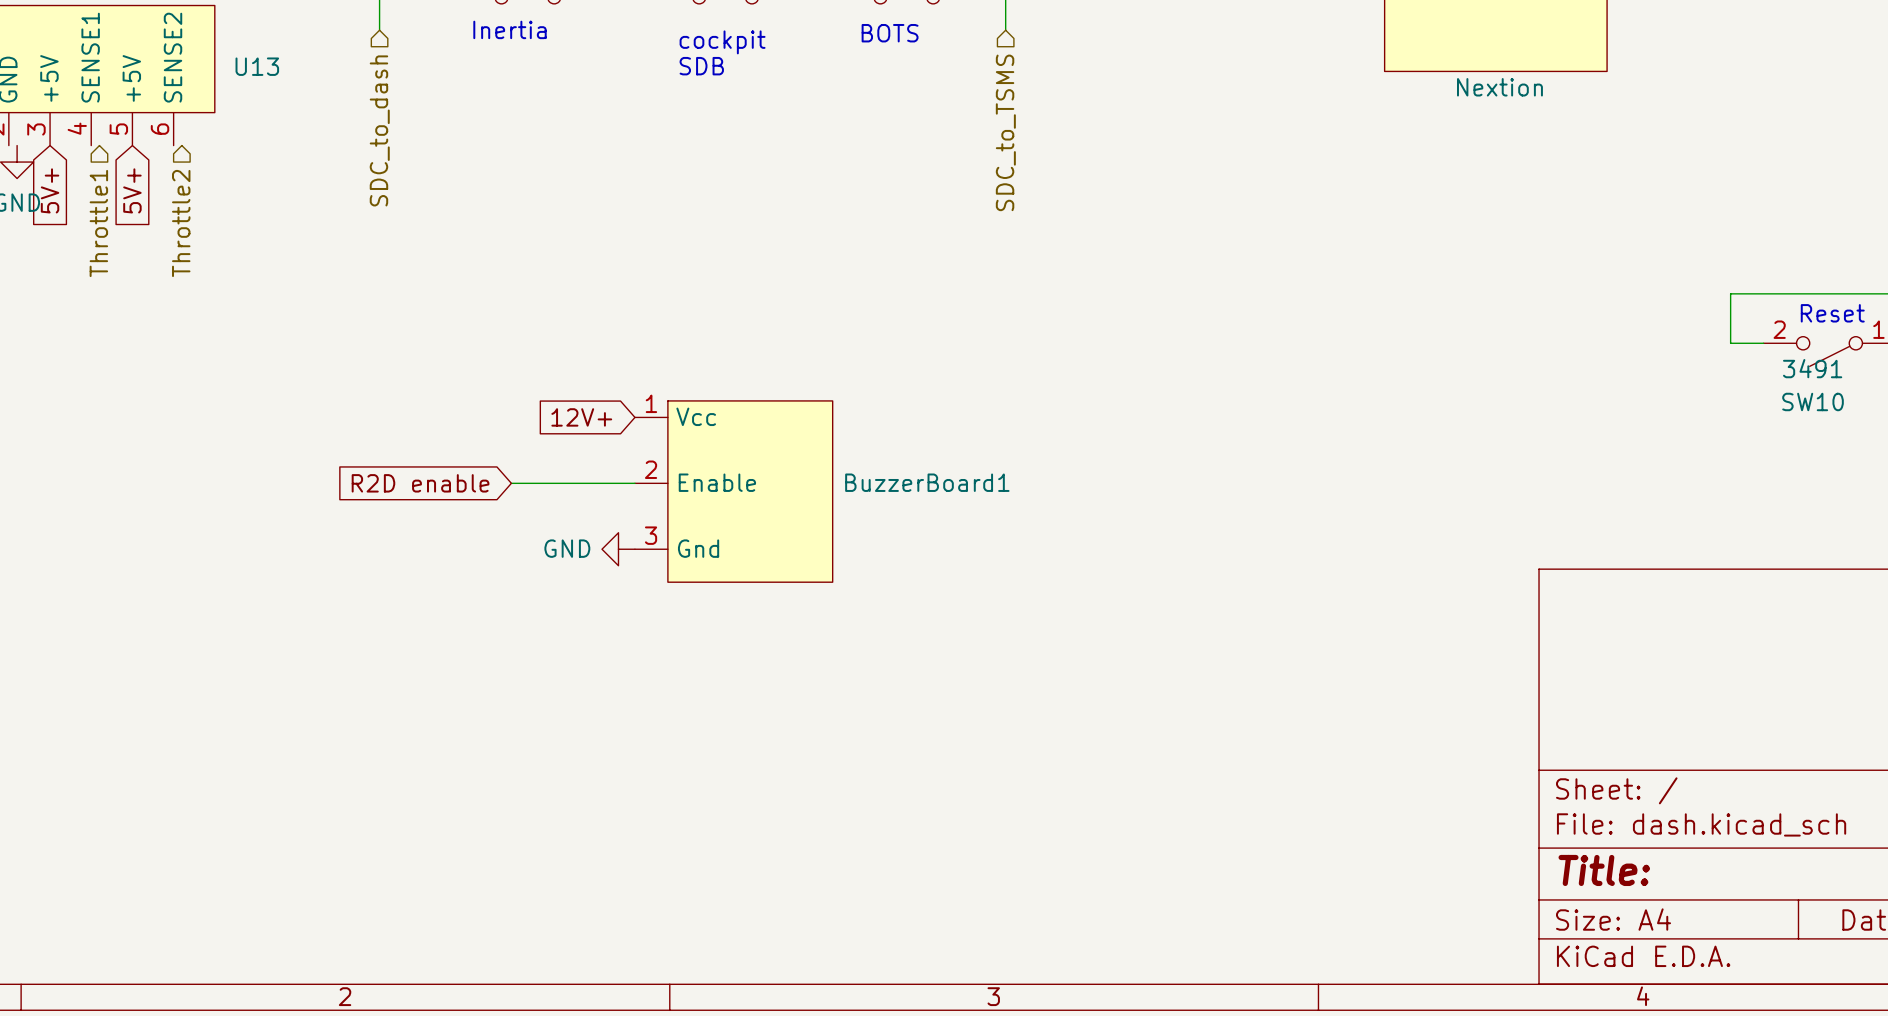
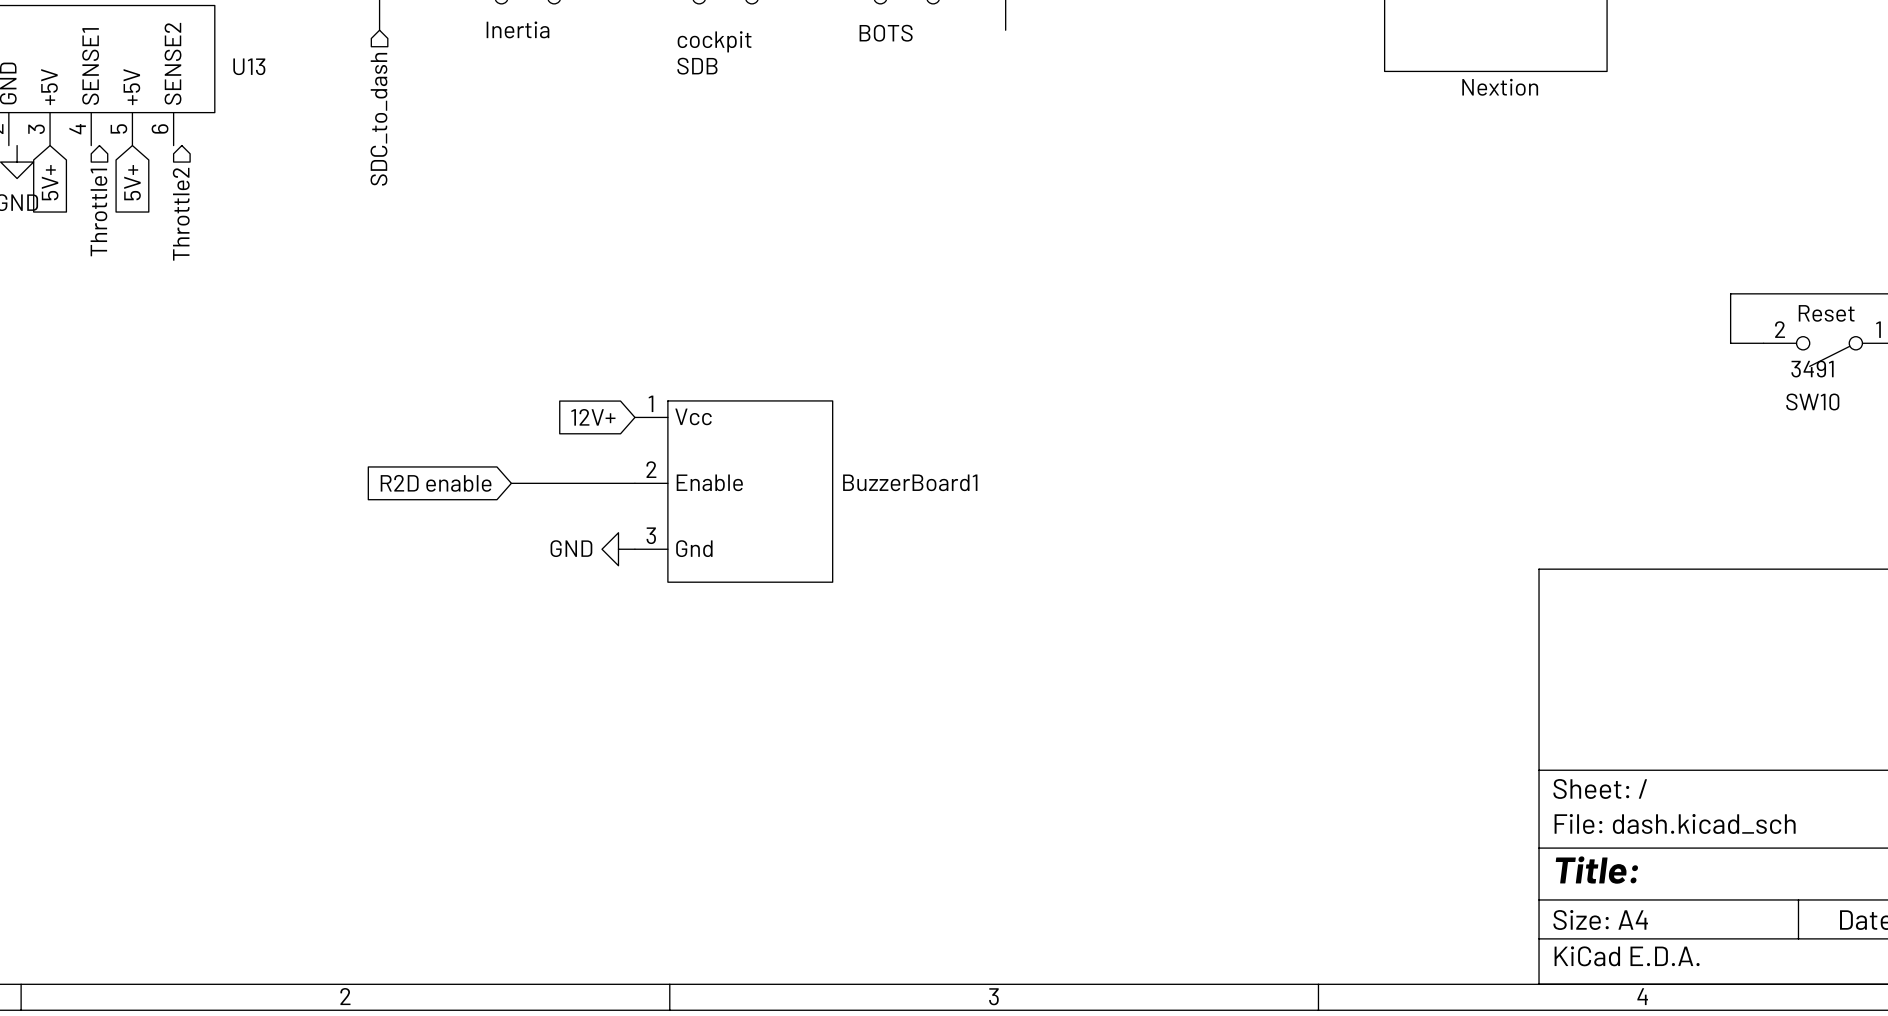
hierarchical label: SDC_to_TSMS (1005, 132) -> none

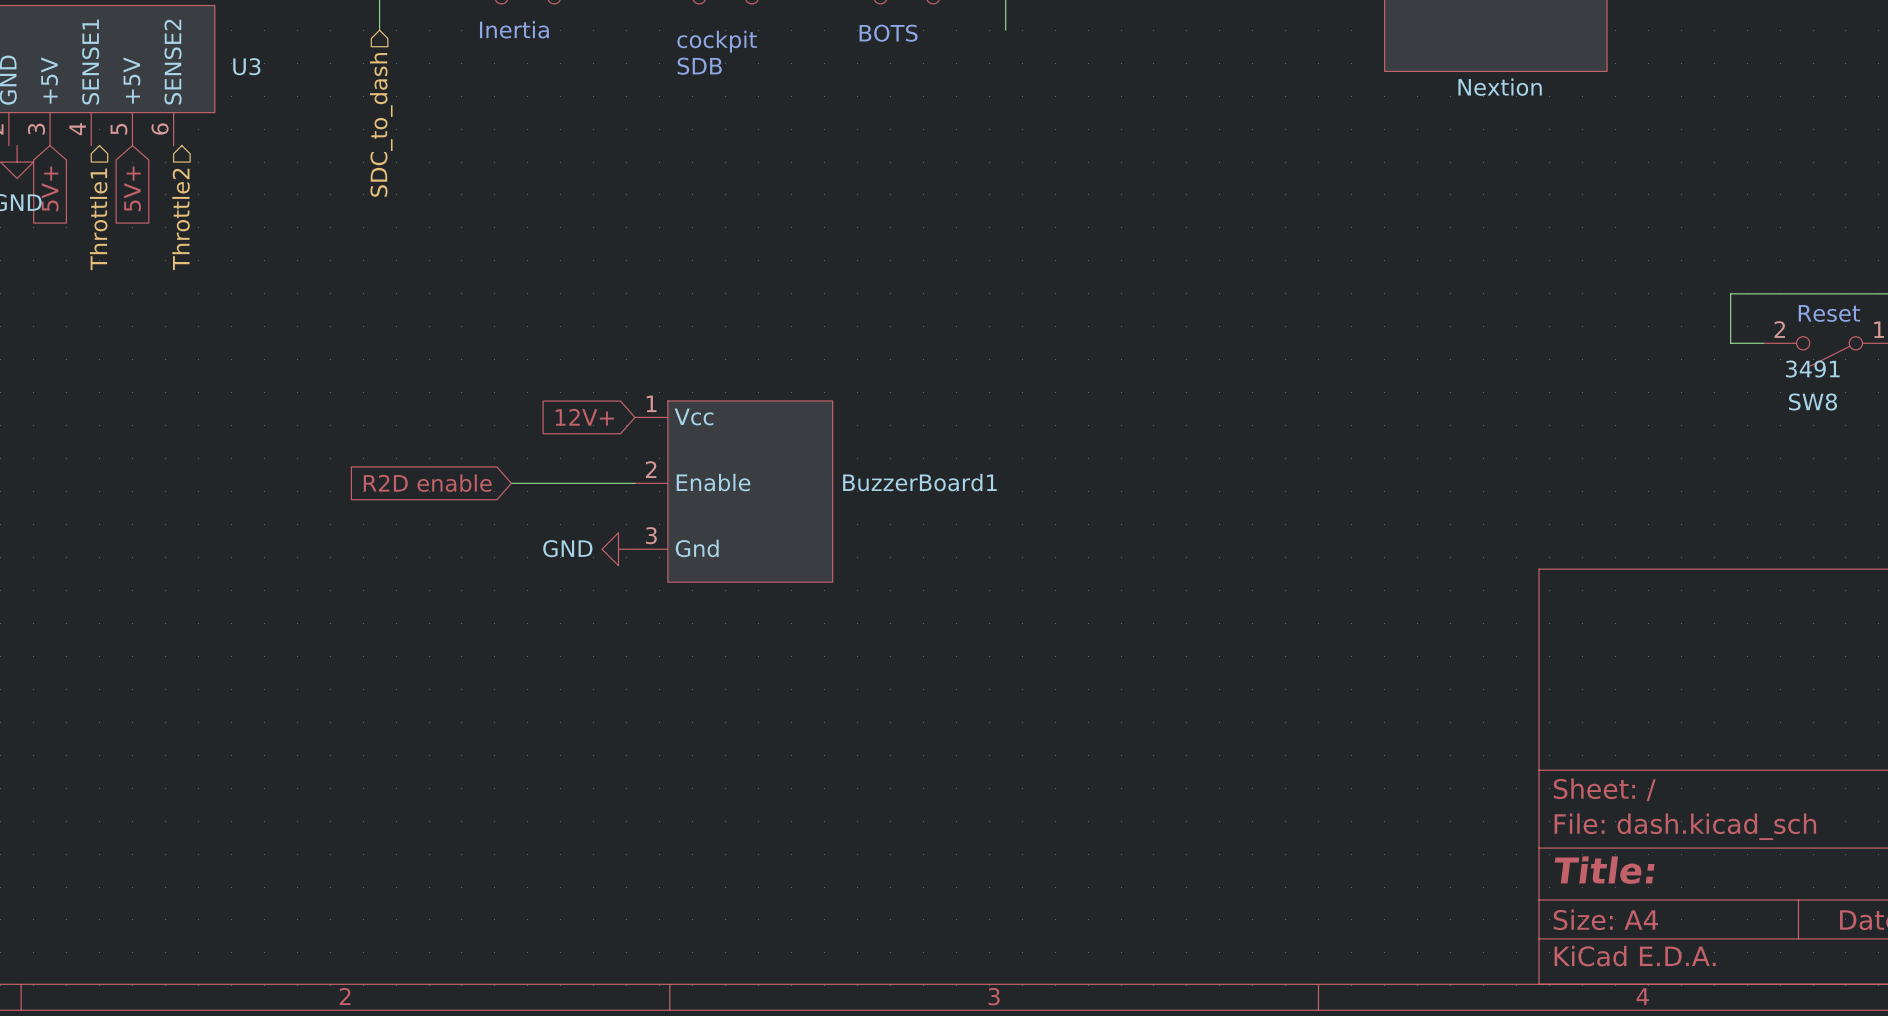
U13 name: U13 (249, 66) -> U3 (246, 66)
SW10 name: SW10 (1812, 401) -> SW8 (1812, 401)

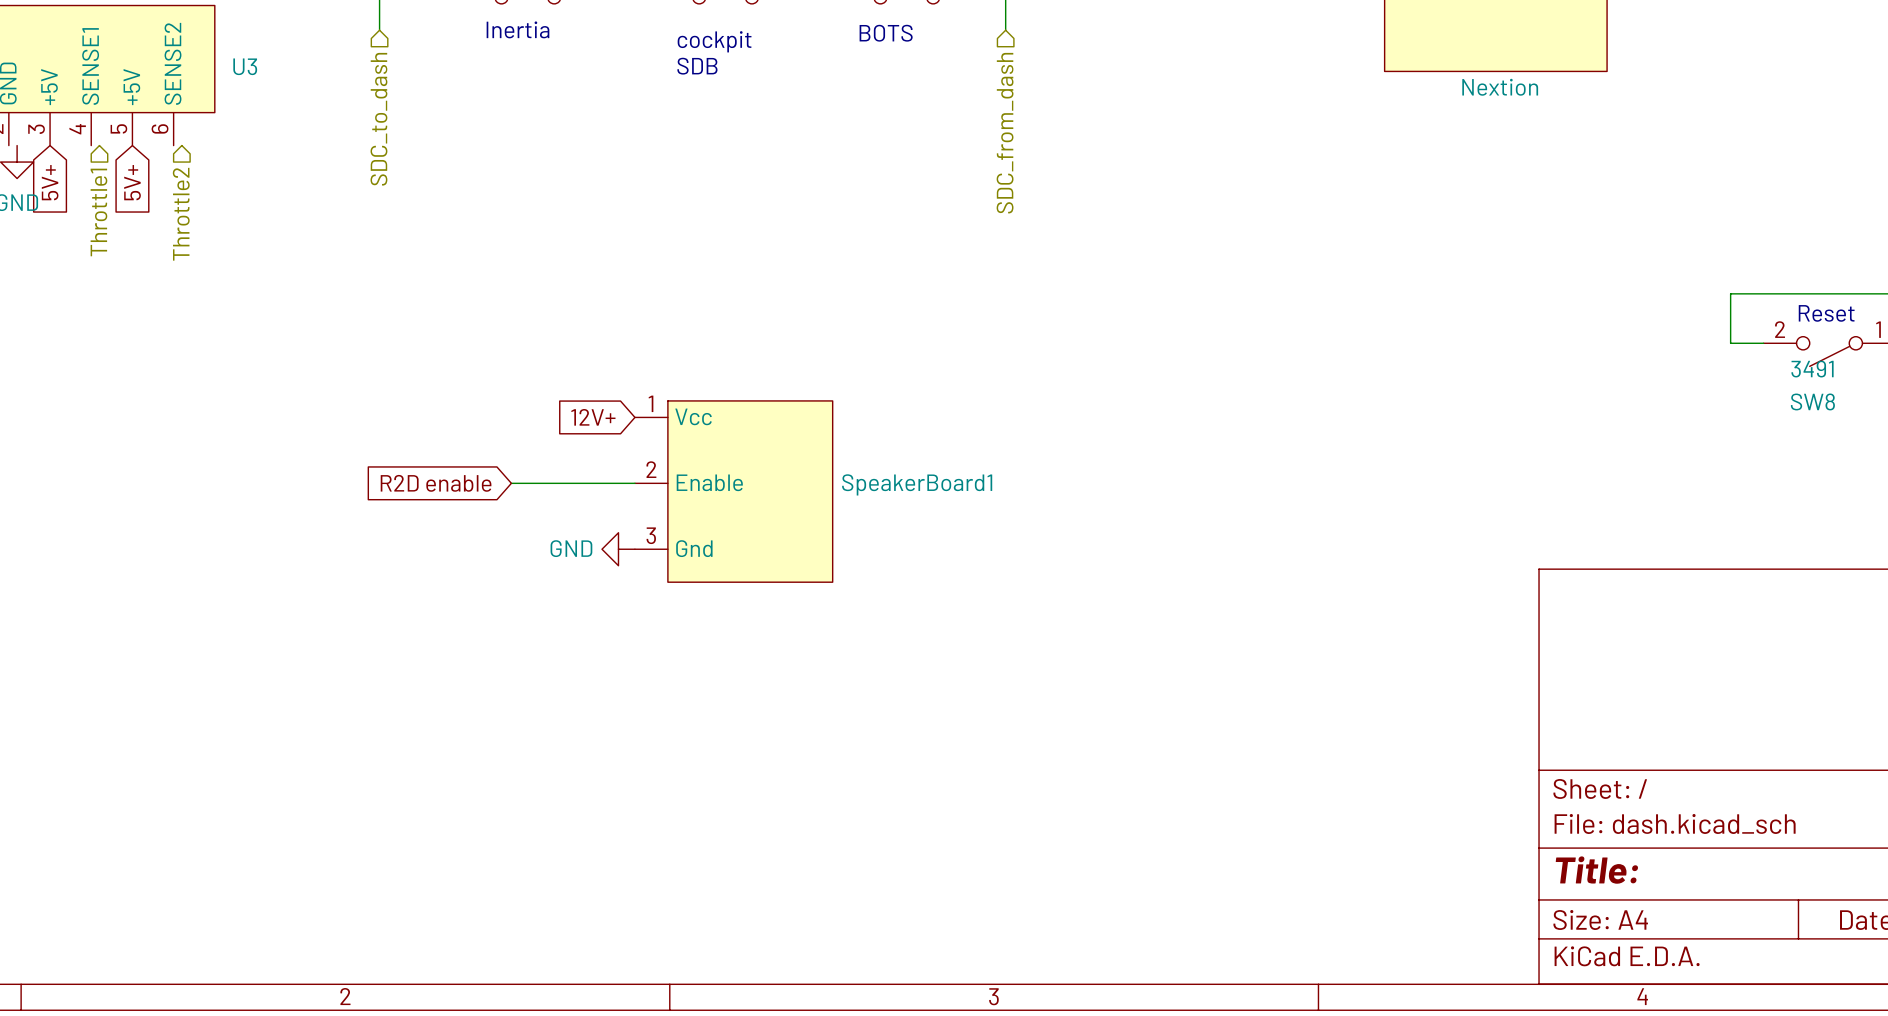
hierarchical label: none -> SDC_from_dash (1005, 133)
BuzzerBoard1 name: BuzzerBoard1 (919, 482) -> SpeakerBoard1 (917, 484)

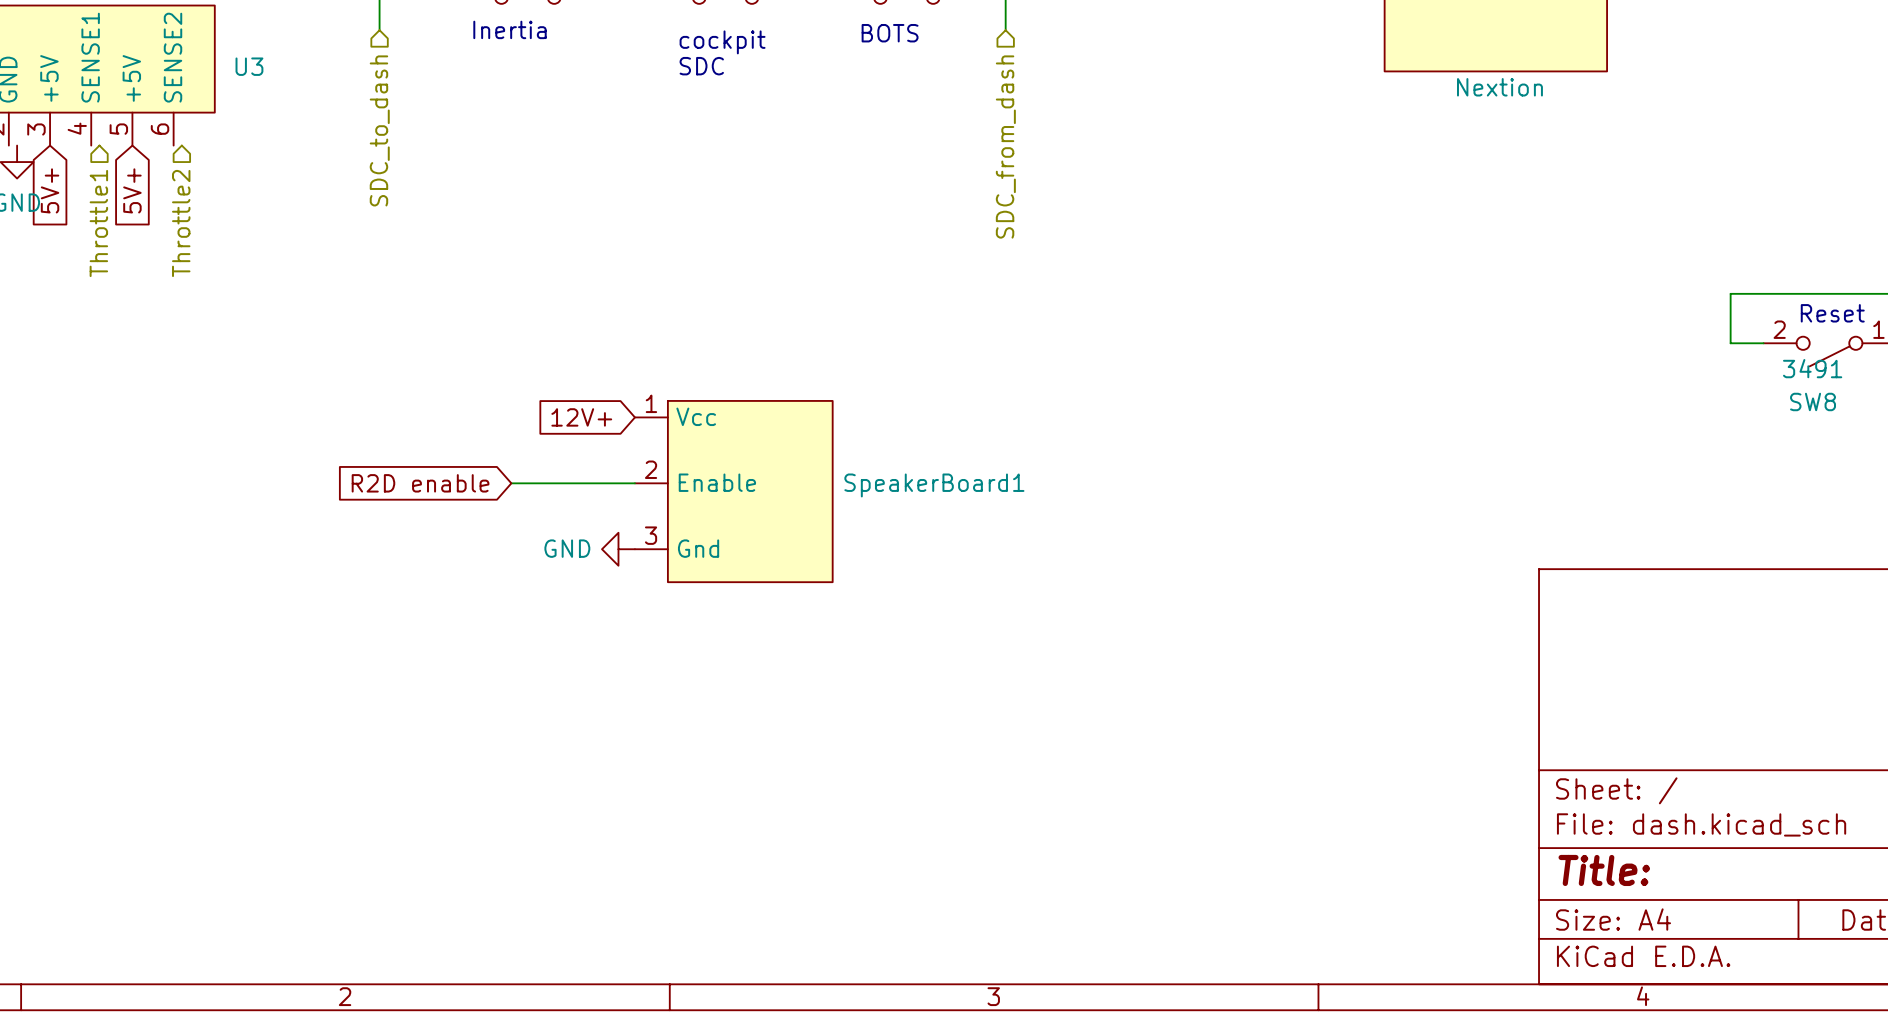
text: SDB (697, 66) -> SDC (701, 66)

